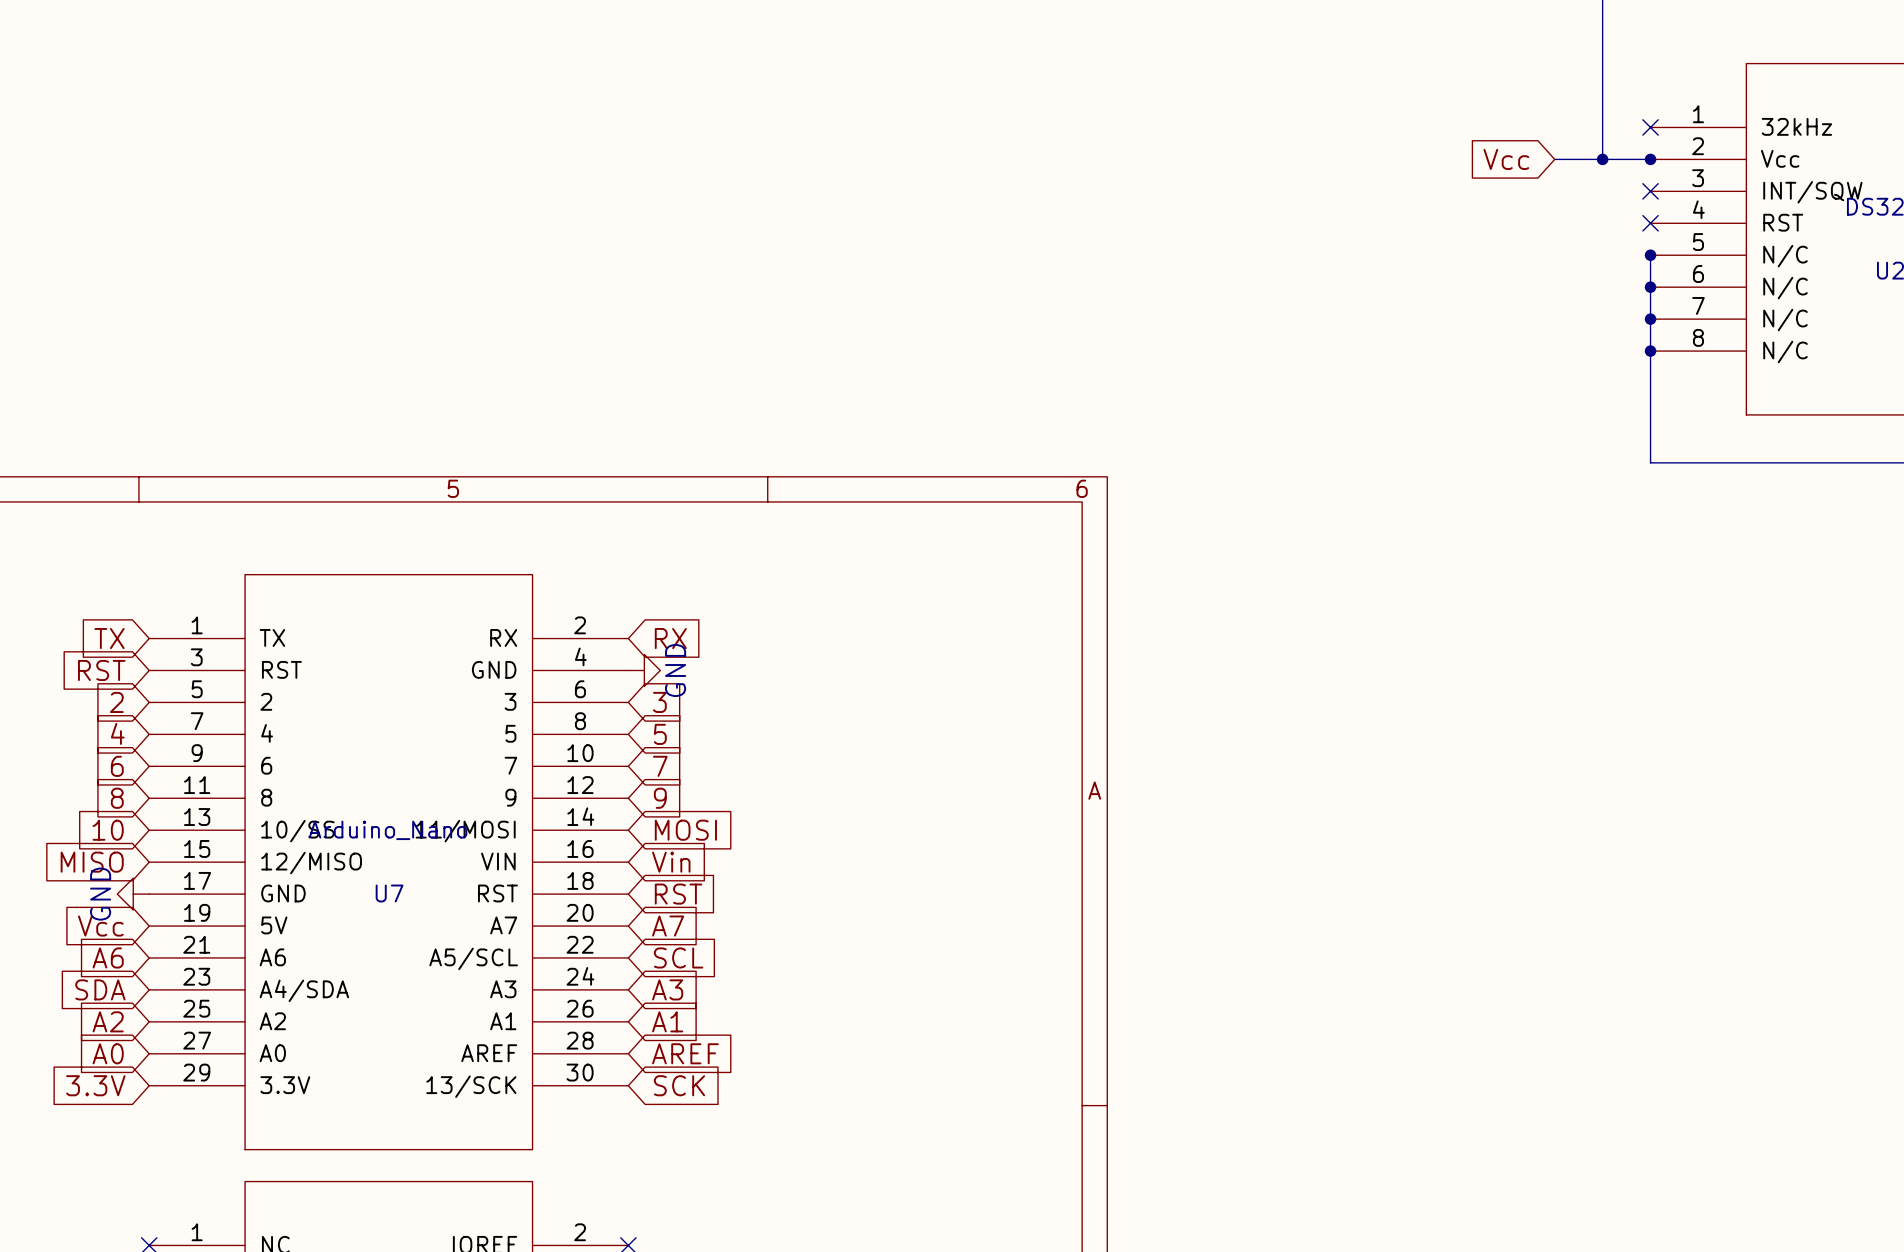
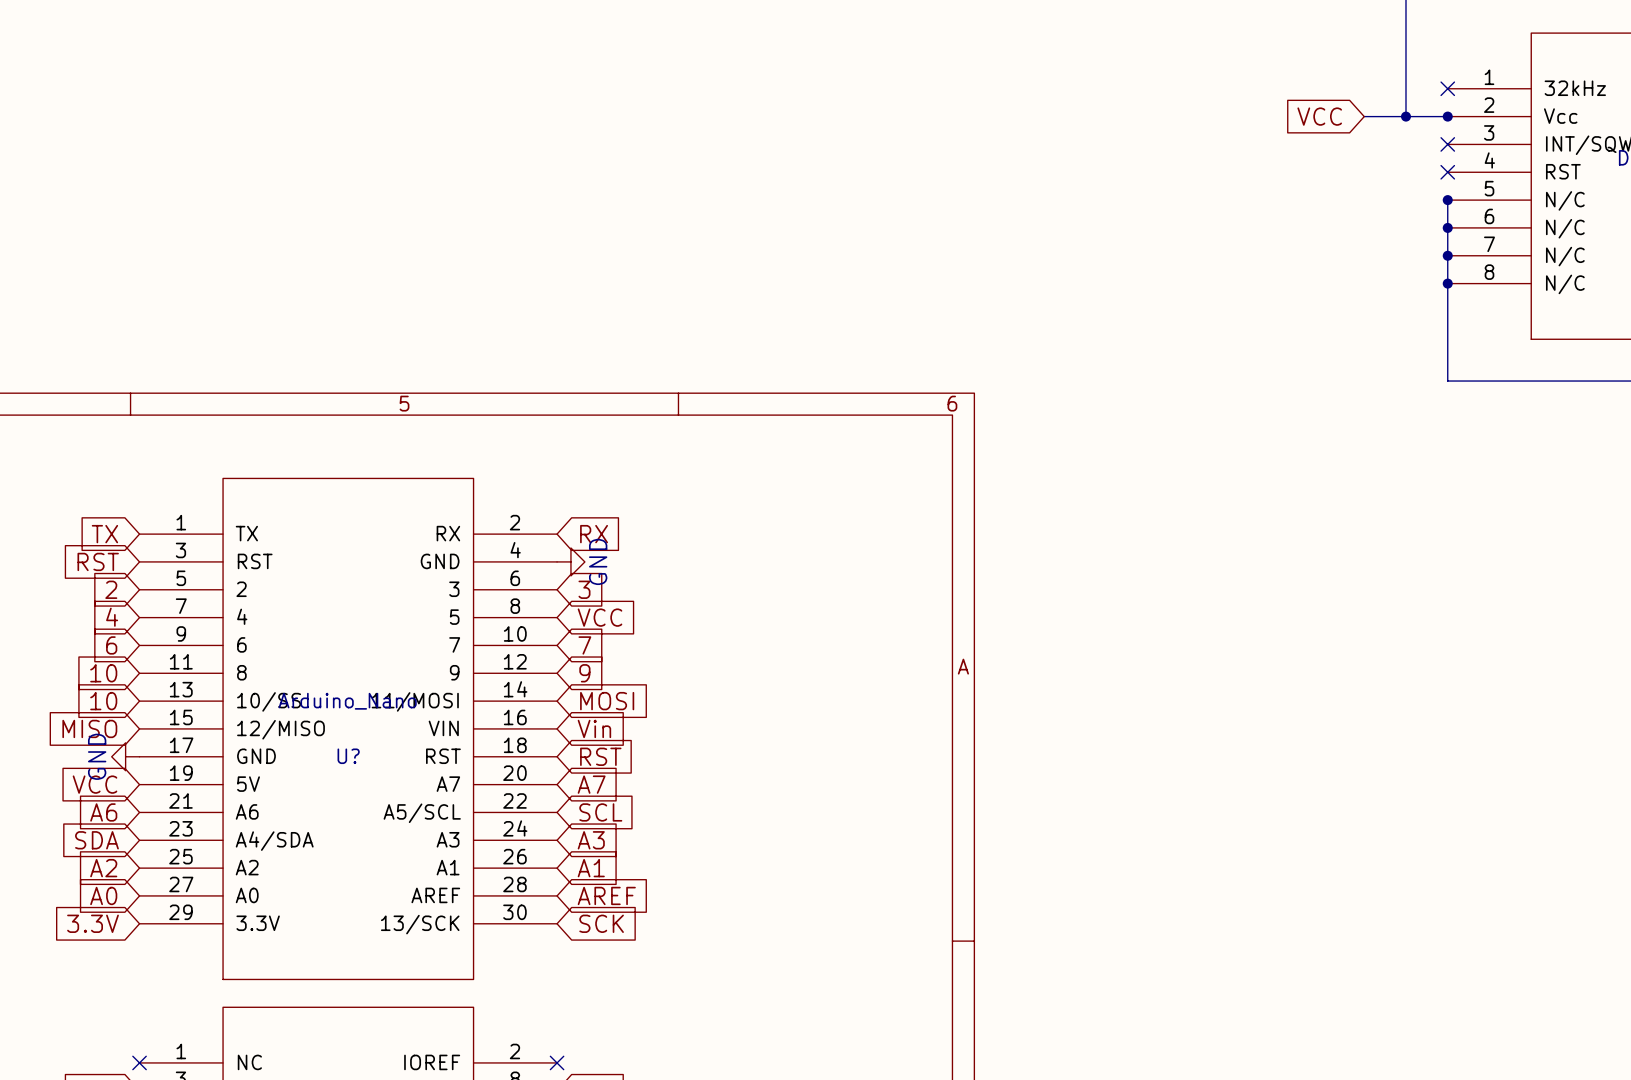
global label: Vcc (1506, 159) -> VCC (1319, 116)
global label: 5 (660, 734) -> VCC (600, 617)
global label: 8 (117, 798) -> 10 (103, 673)
U7 name: U7 (389, 893) -> U? (348, 756)
global label: Vcc (100, 926) -> VCC (94, 784)

